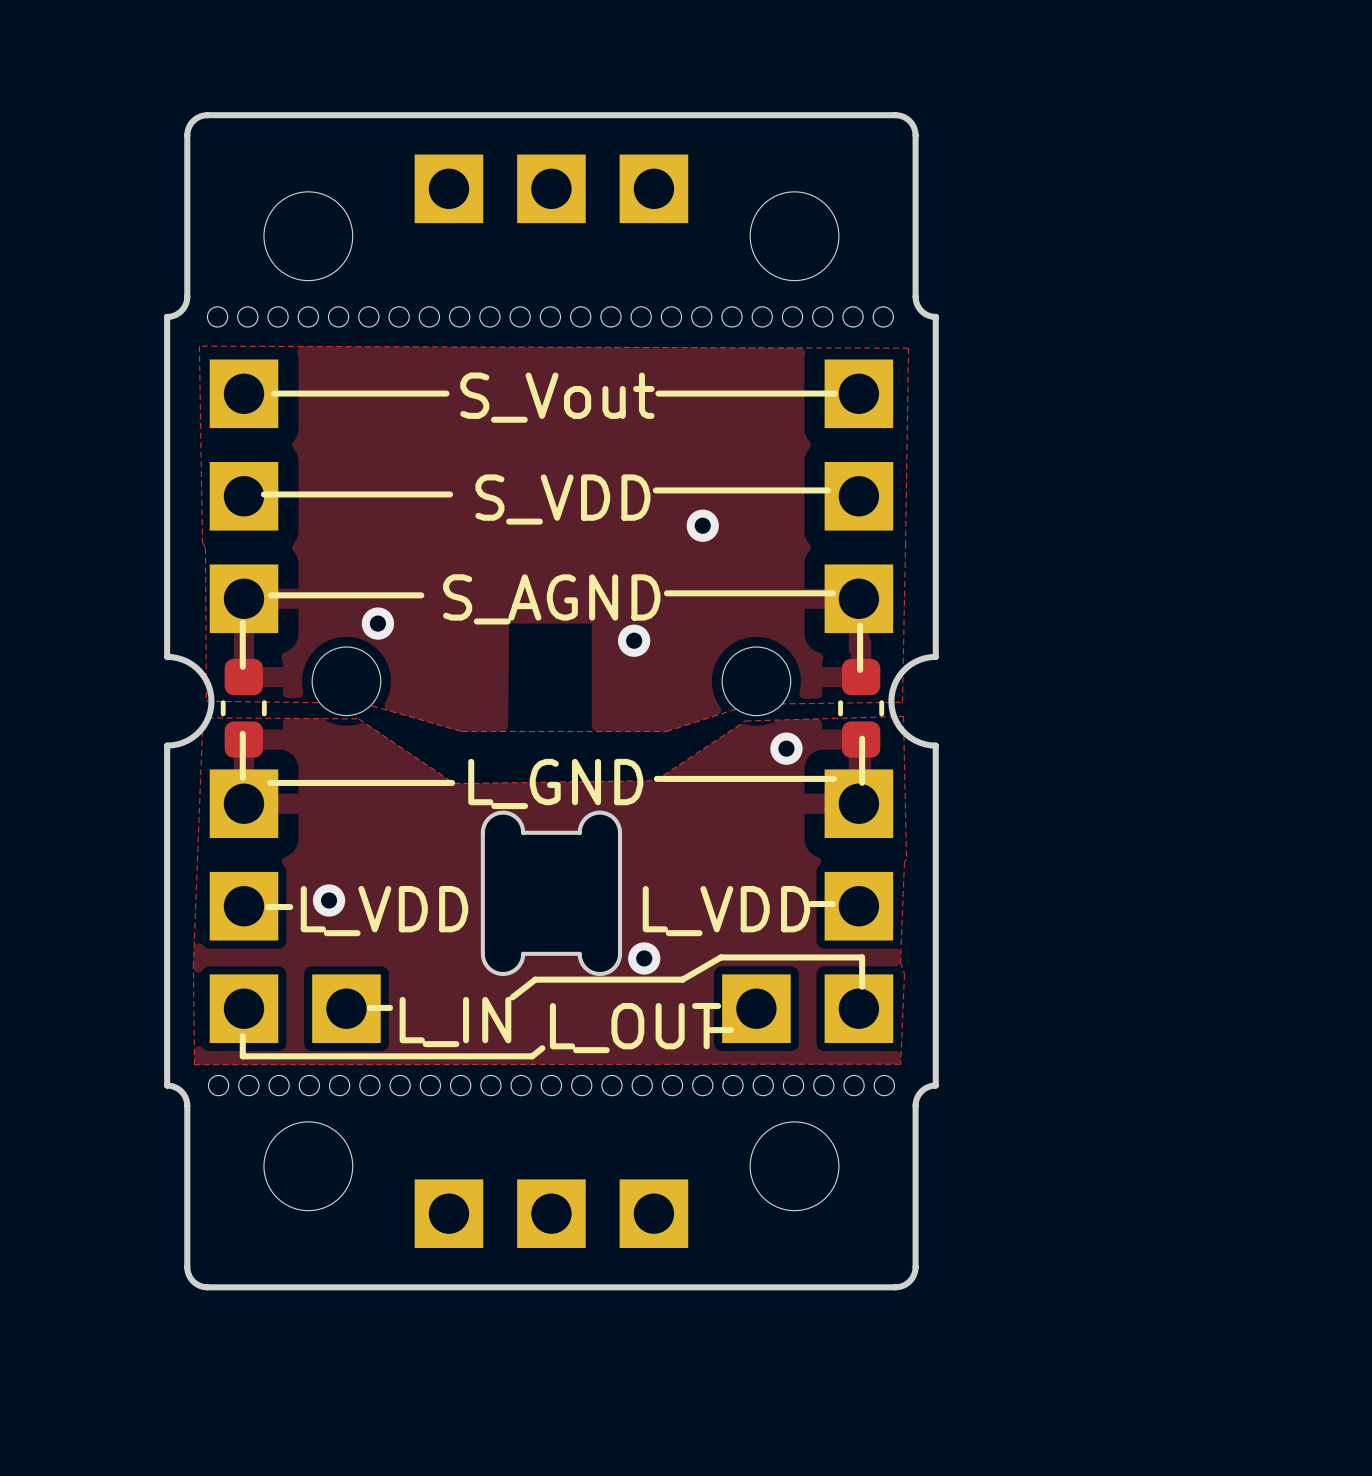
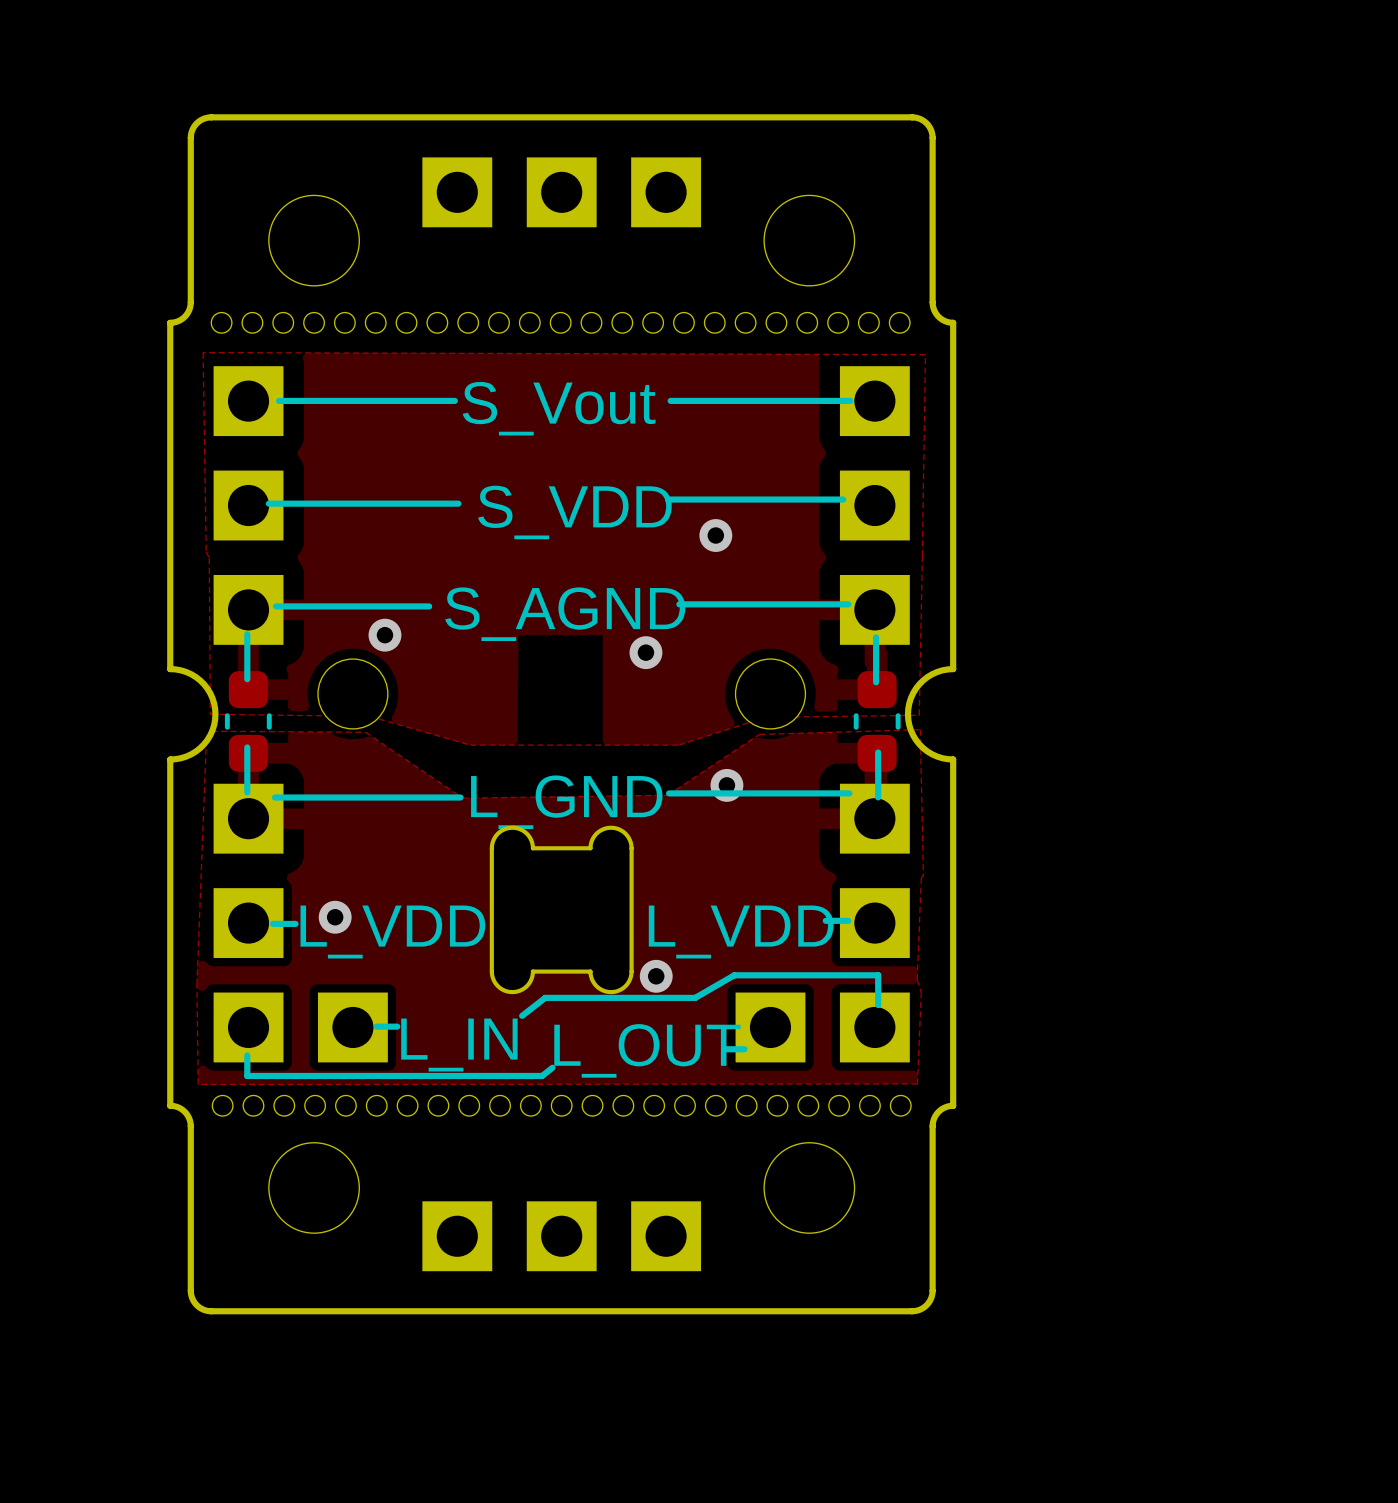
via position: (786, 748) -> (726, 785)

